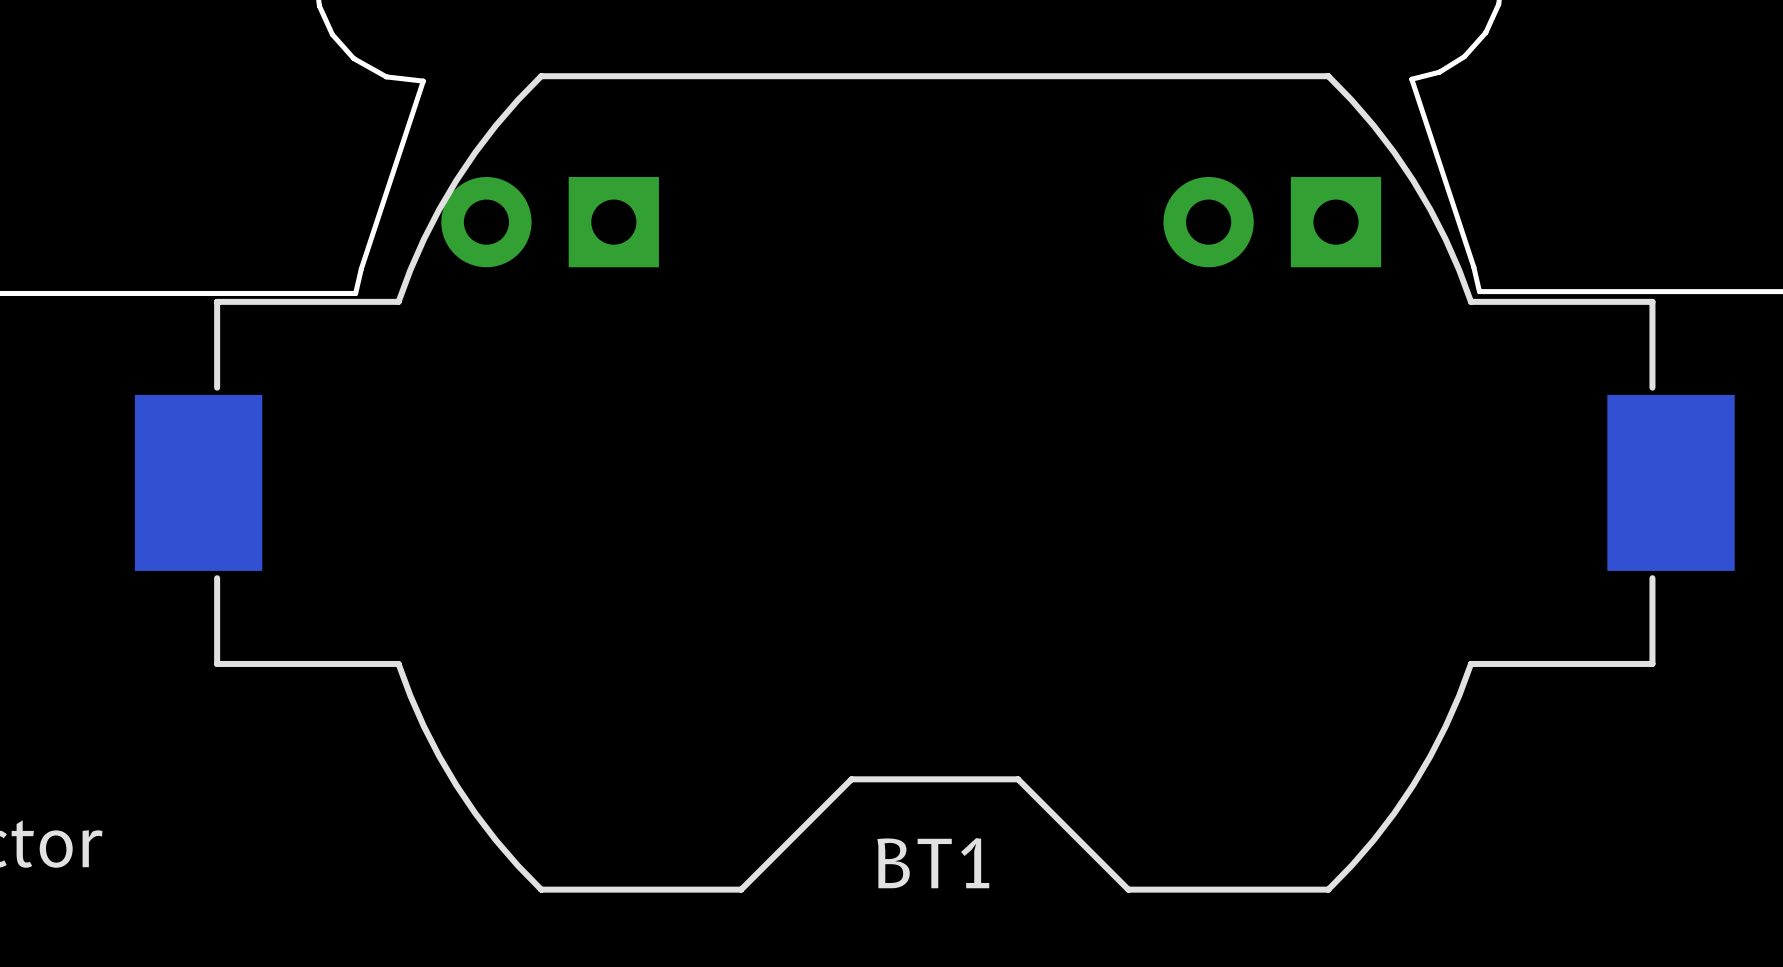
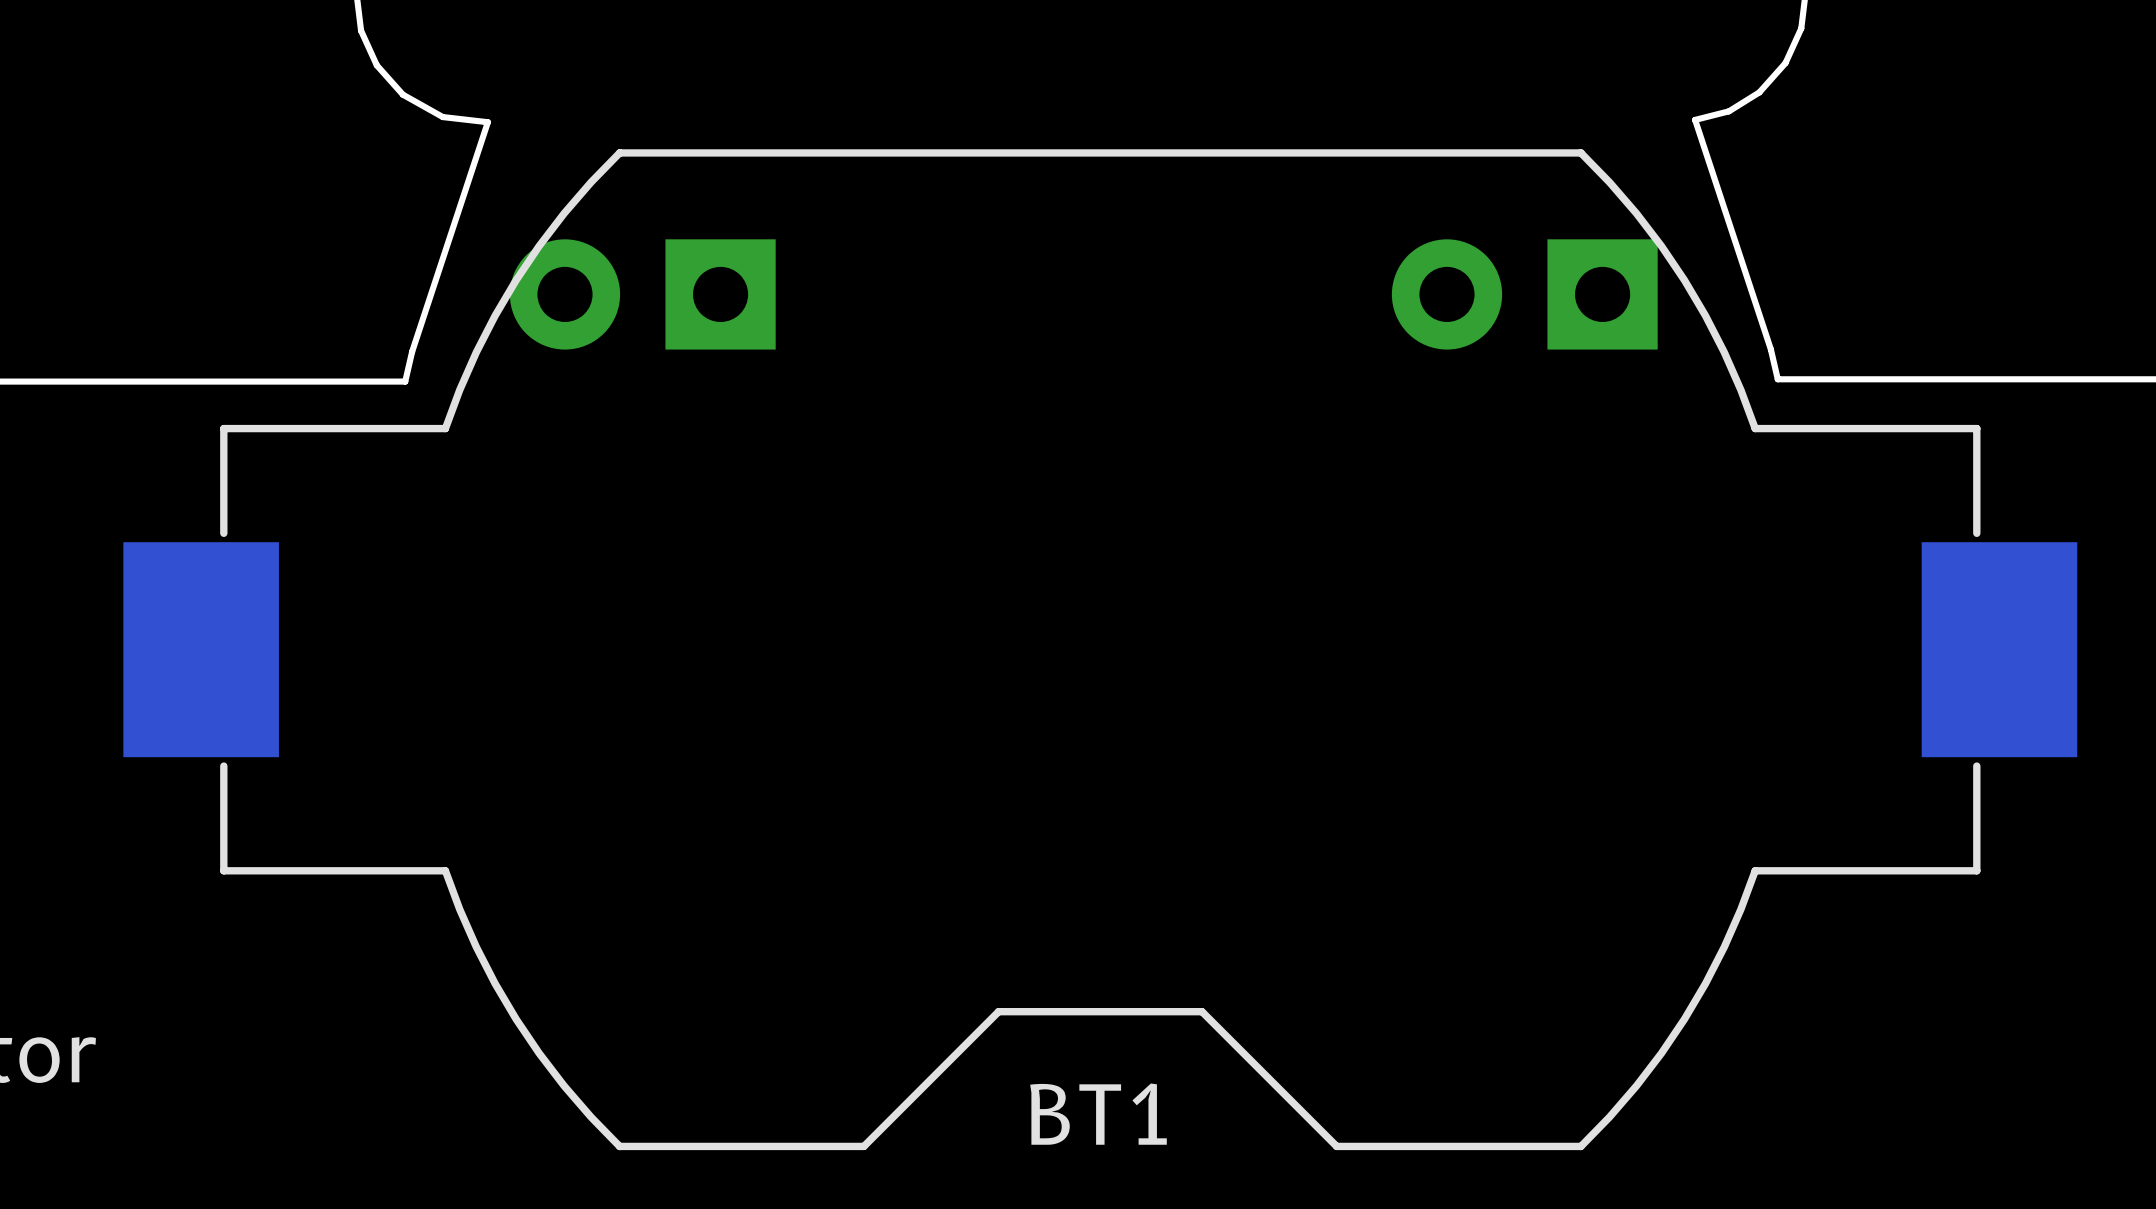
BT1 position: (934, 482) -> (1100, 649)

